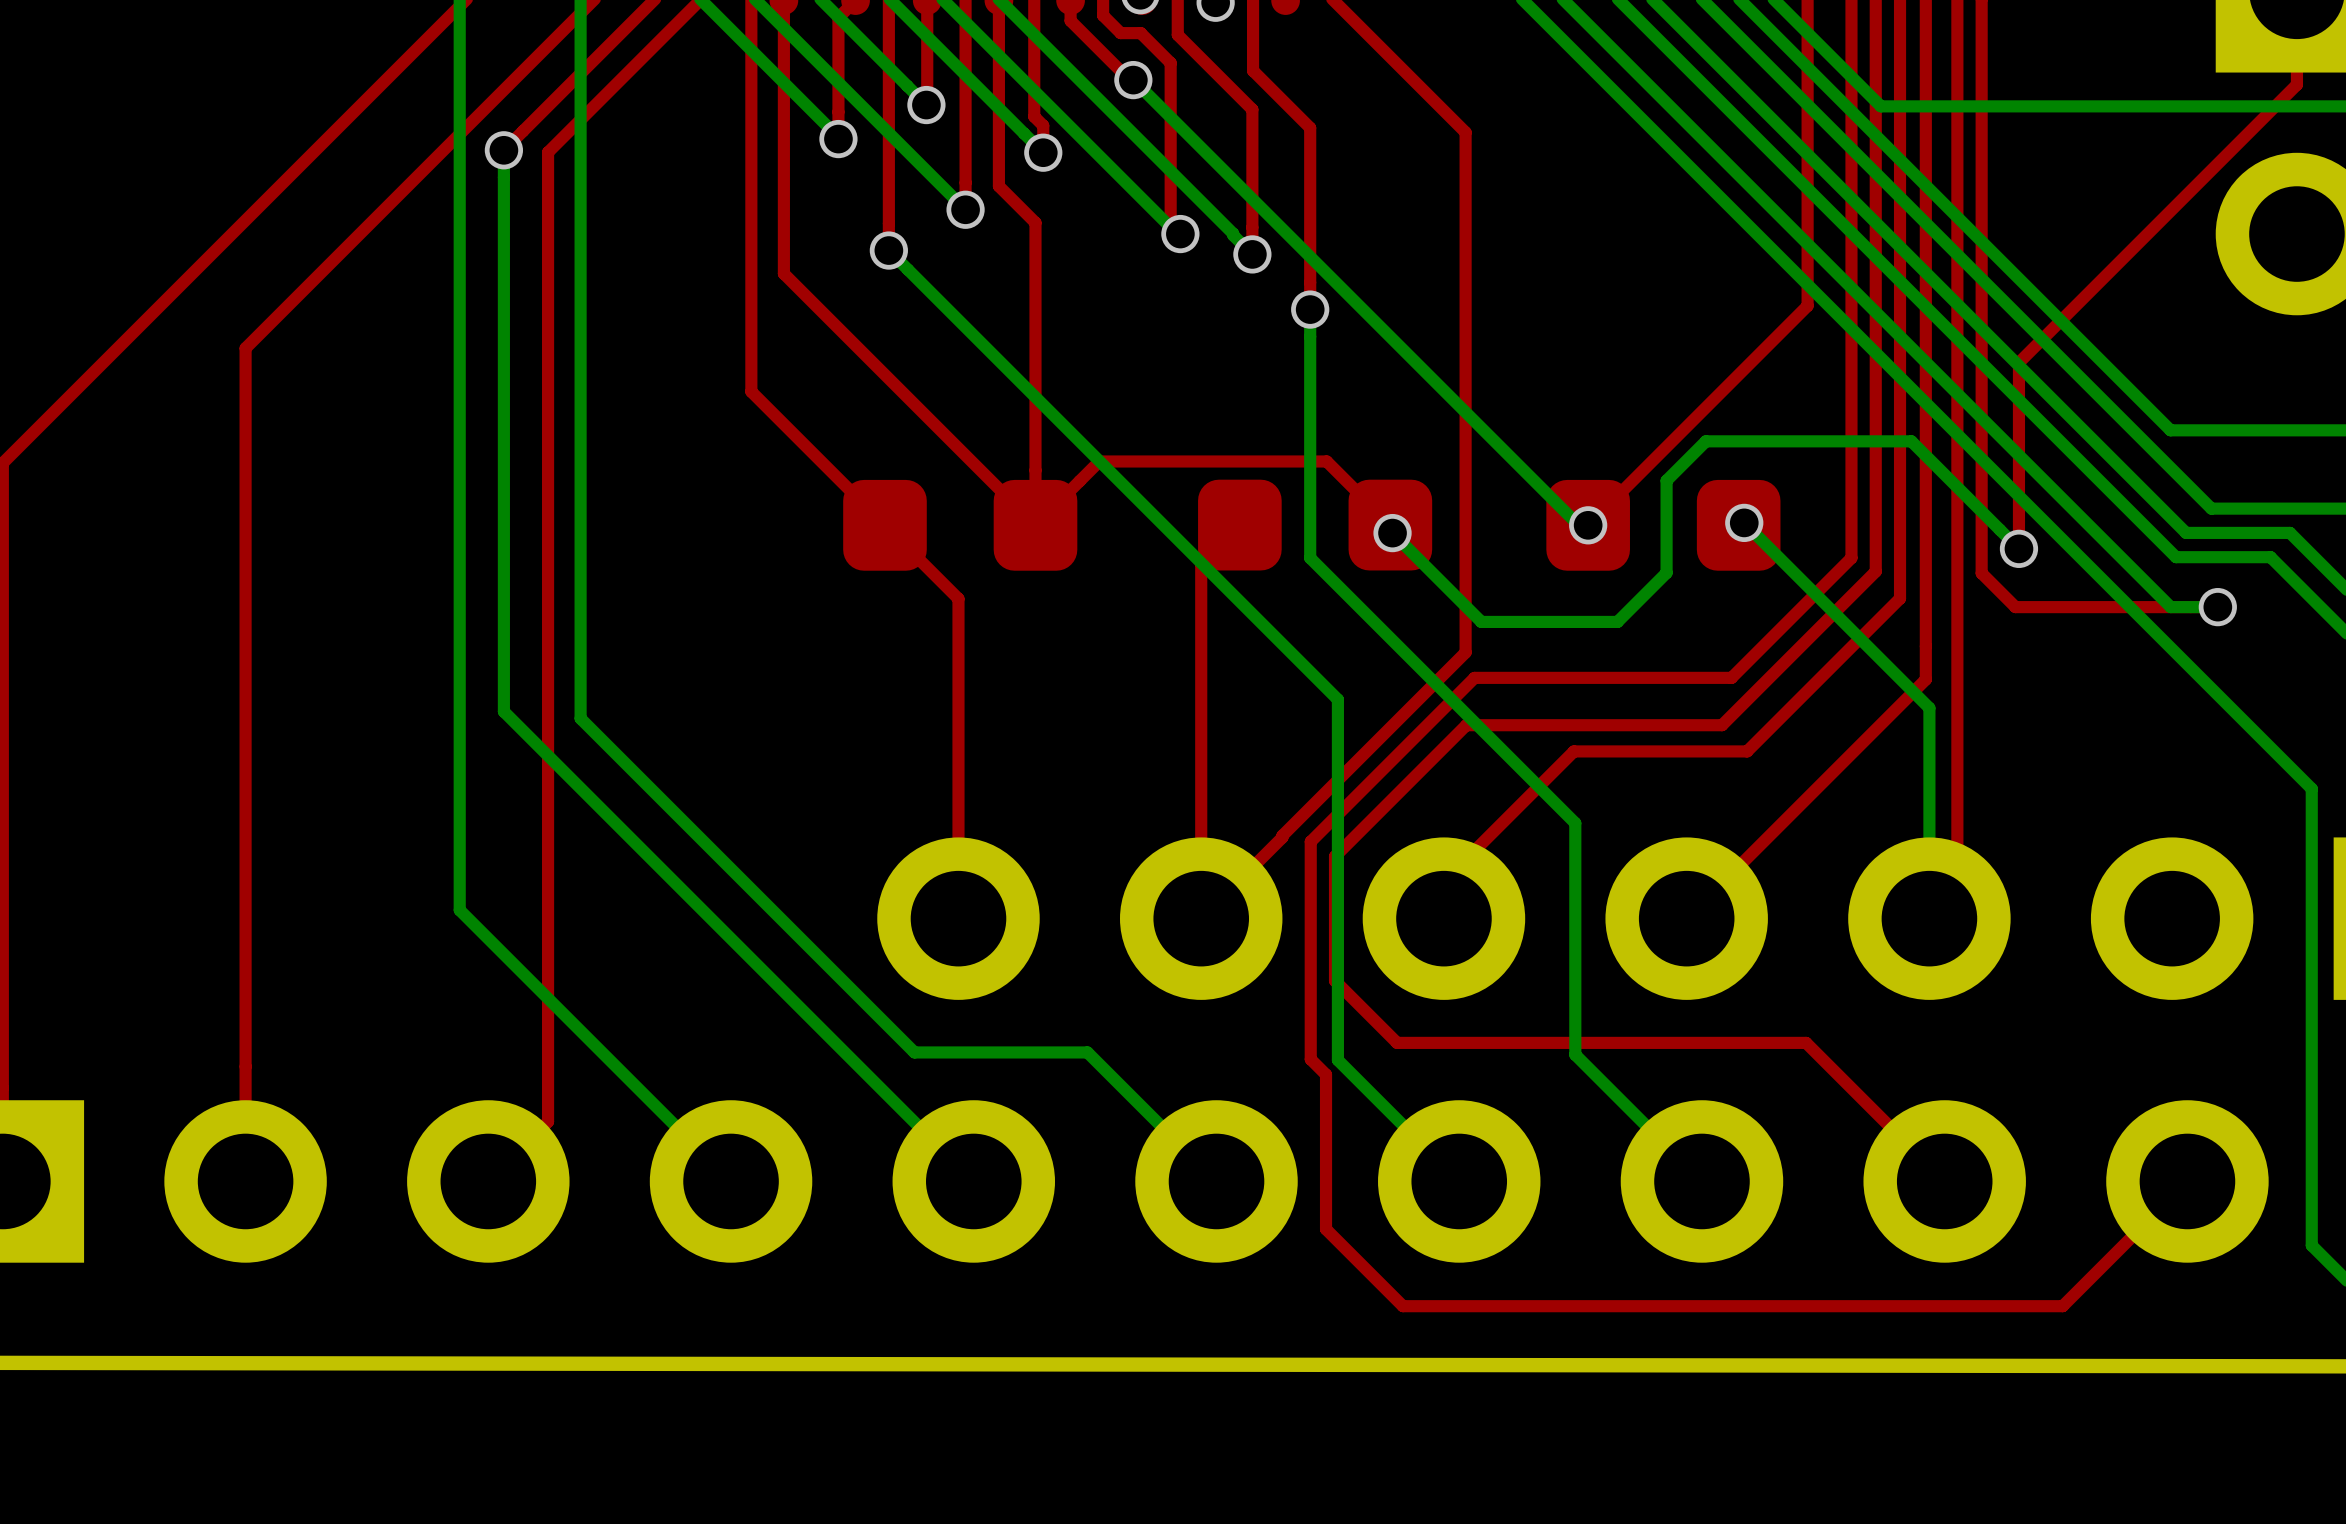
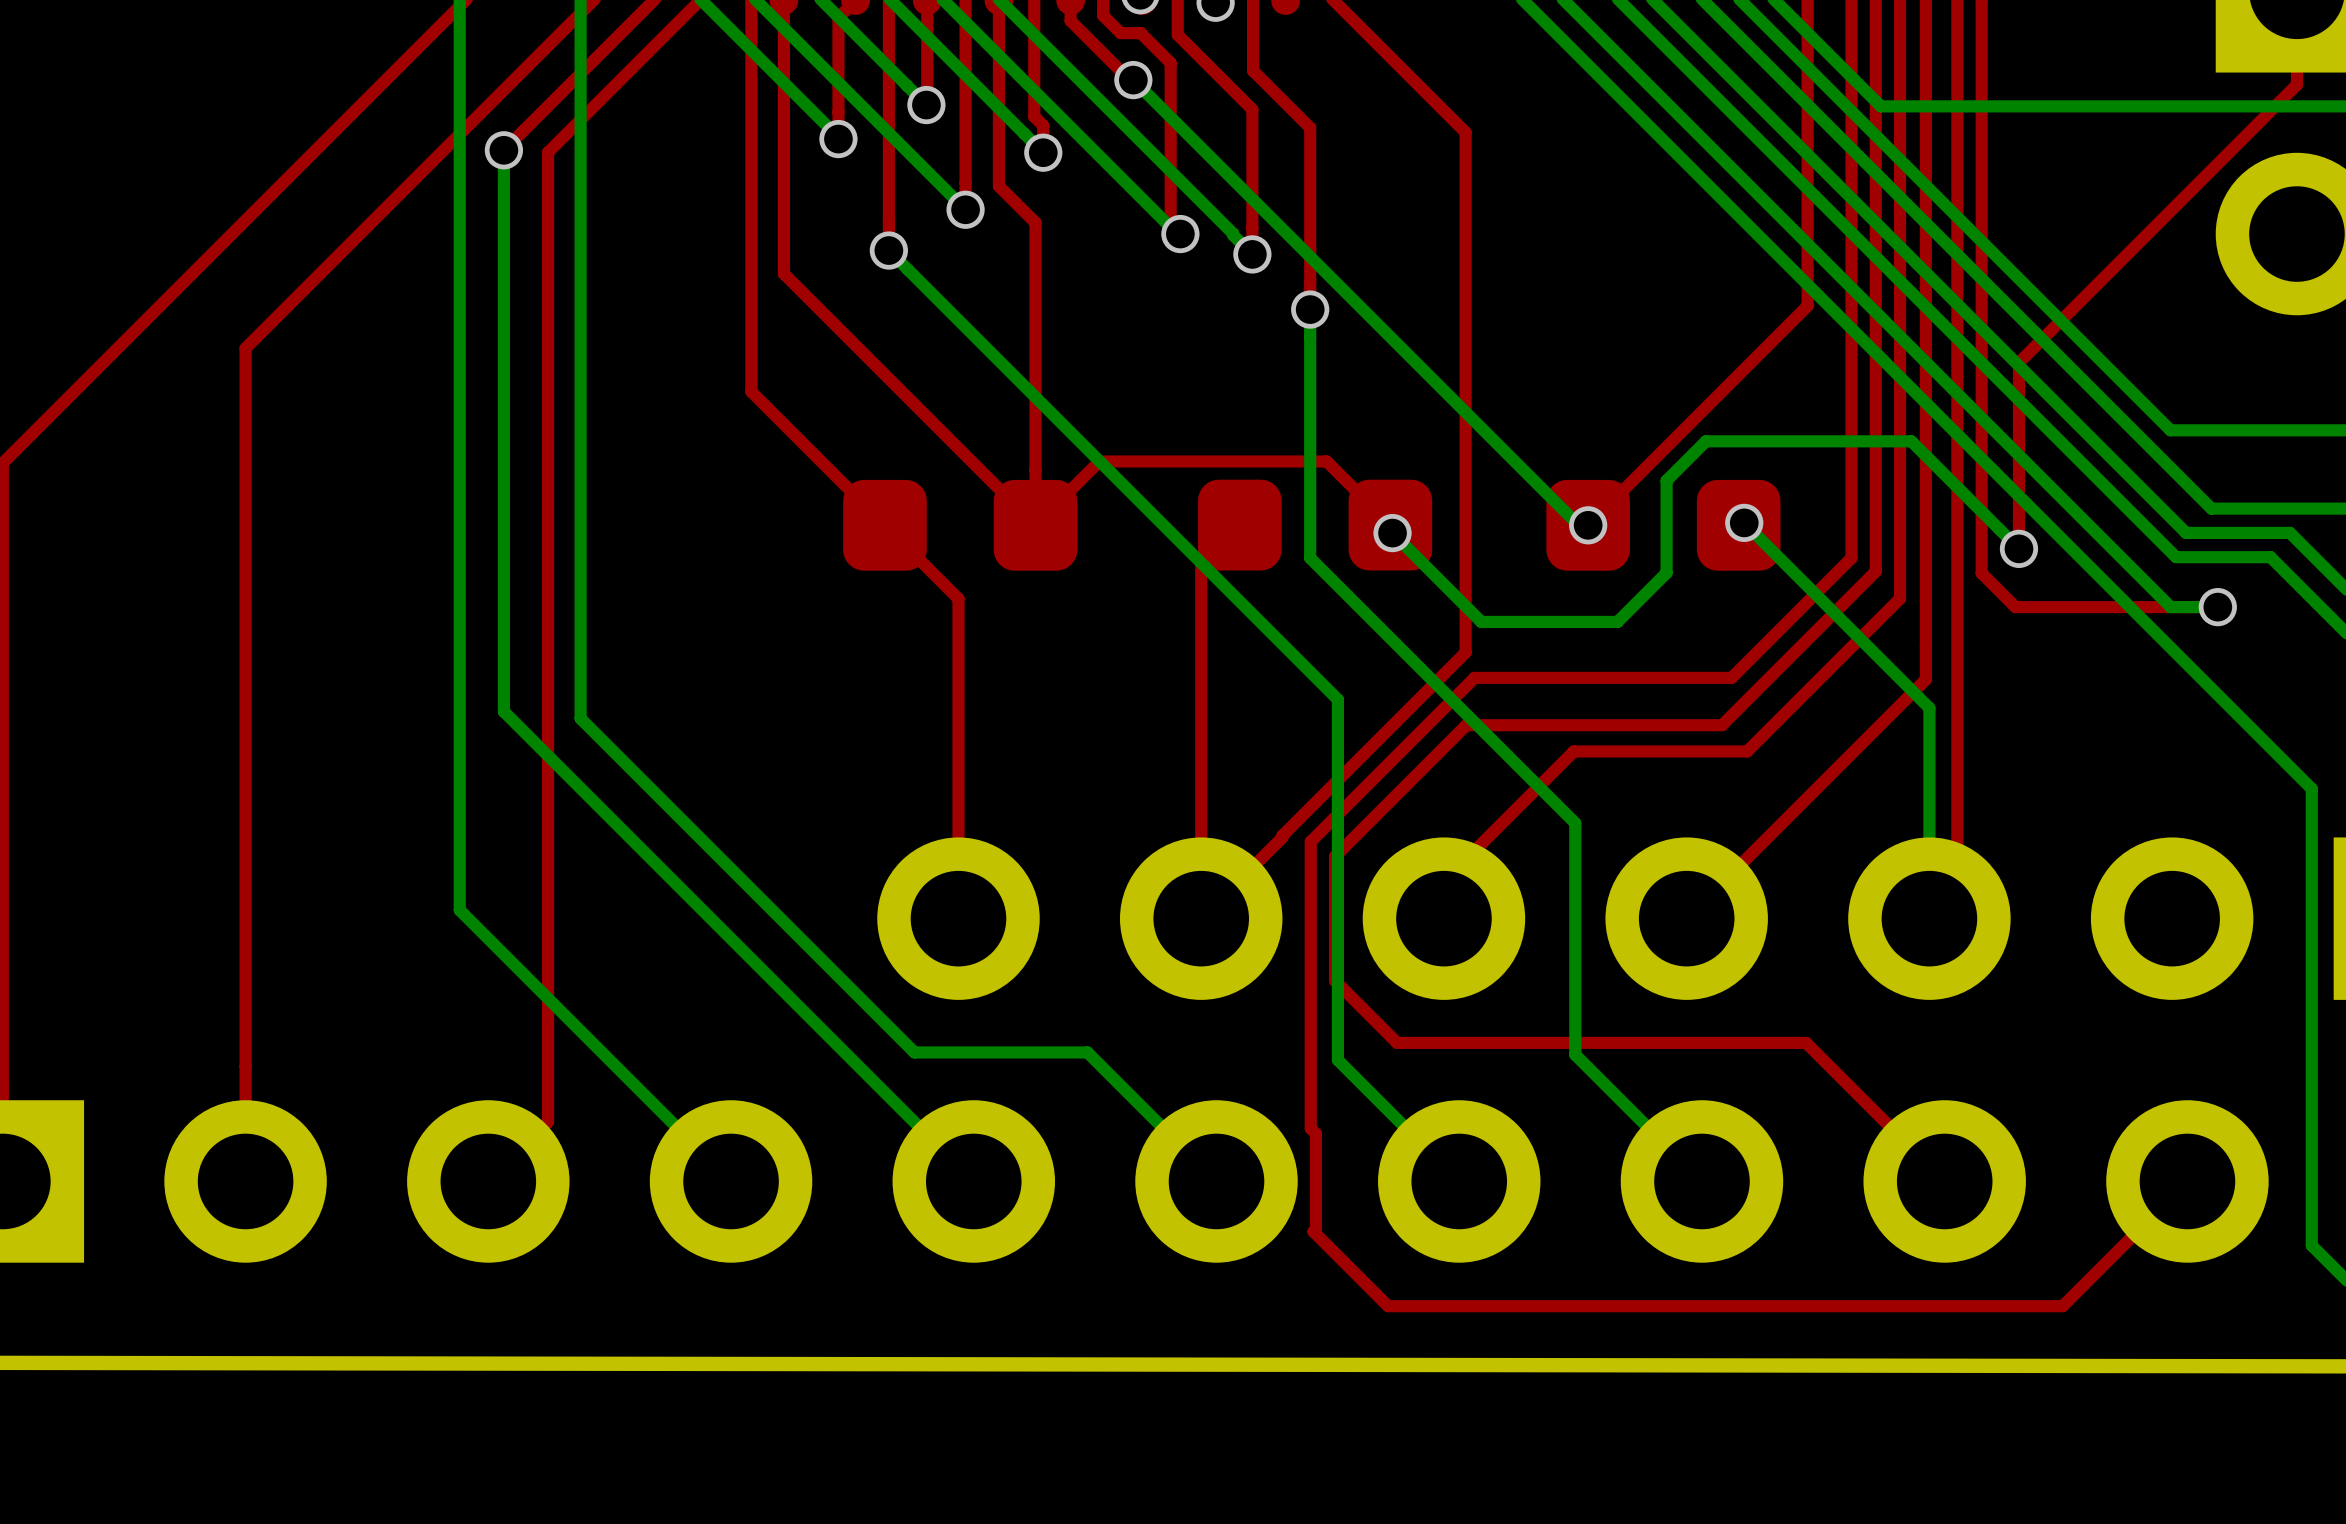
top track: (1310, 1059) (1326, 1074) (1326, 1229) (1402, 1306) -> (1310, 1059) (1310, 1128) (1315, 1133) (1315, 1229) (1313, 1231) (1388, 1306) (1402, 1306)

